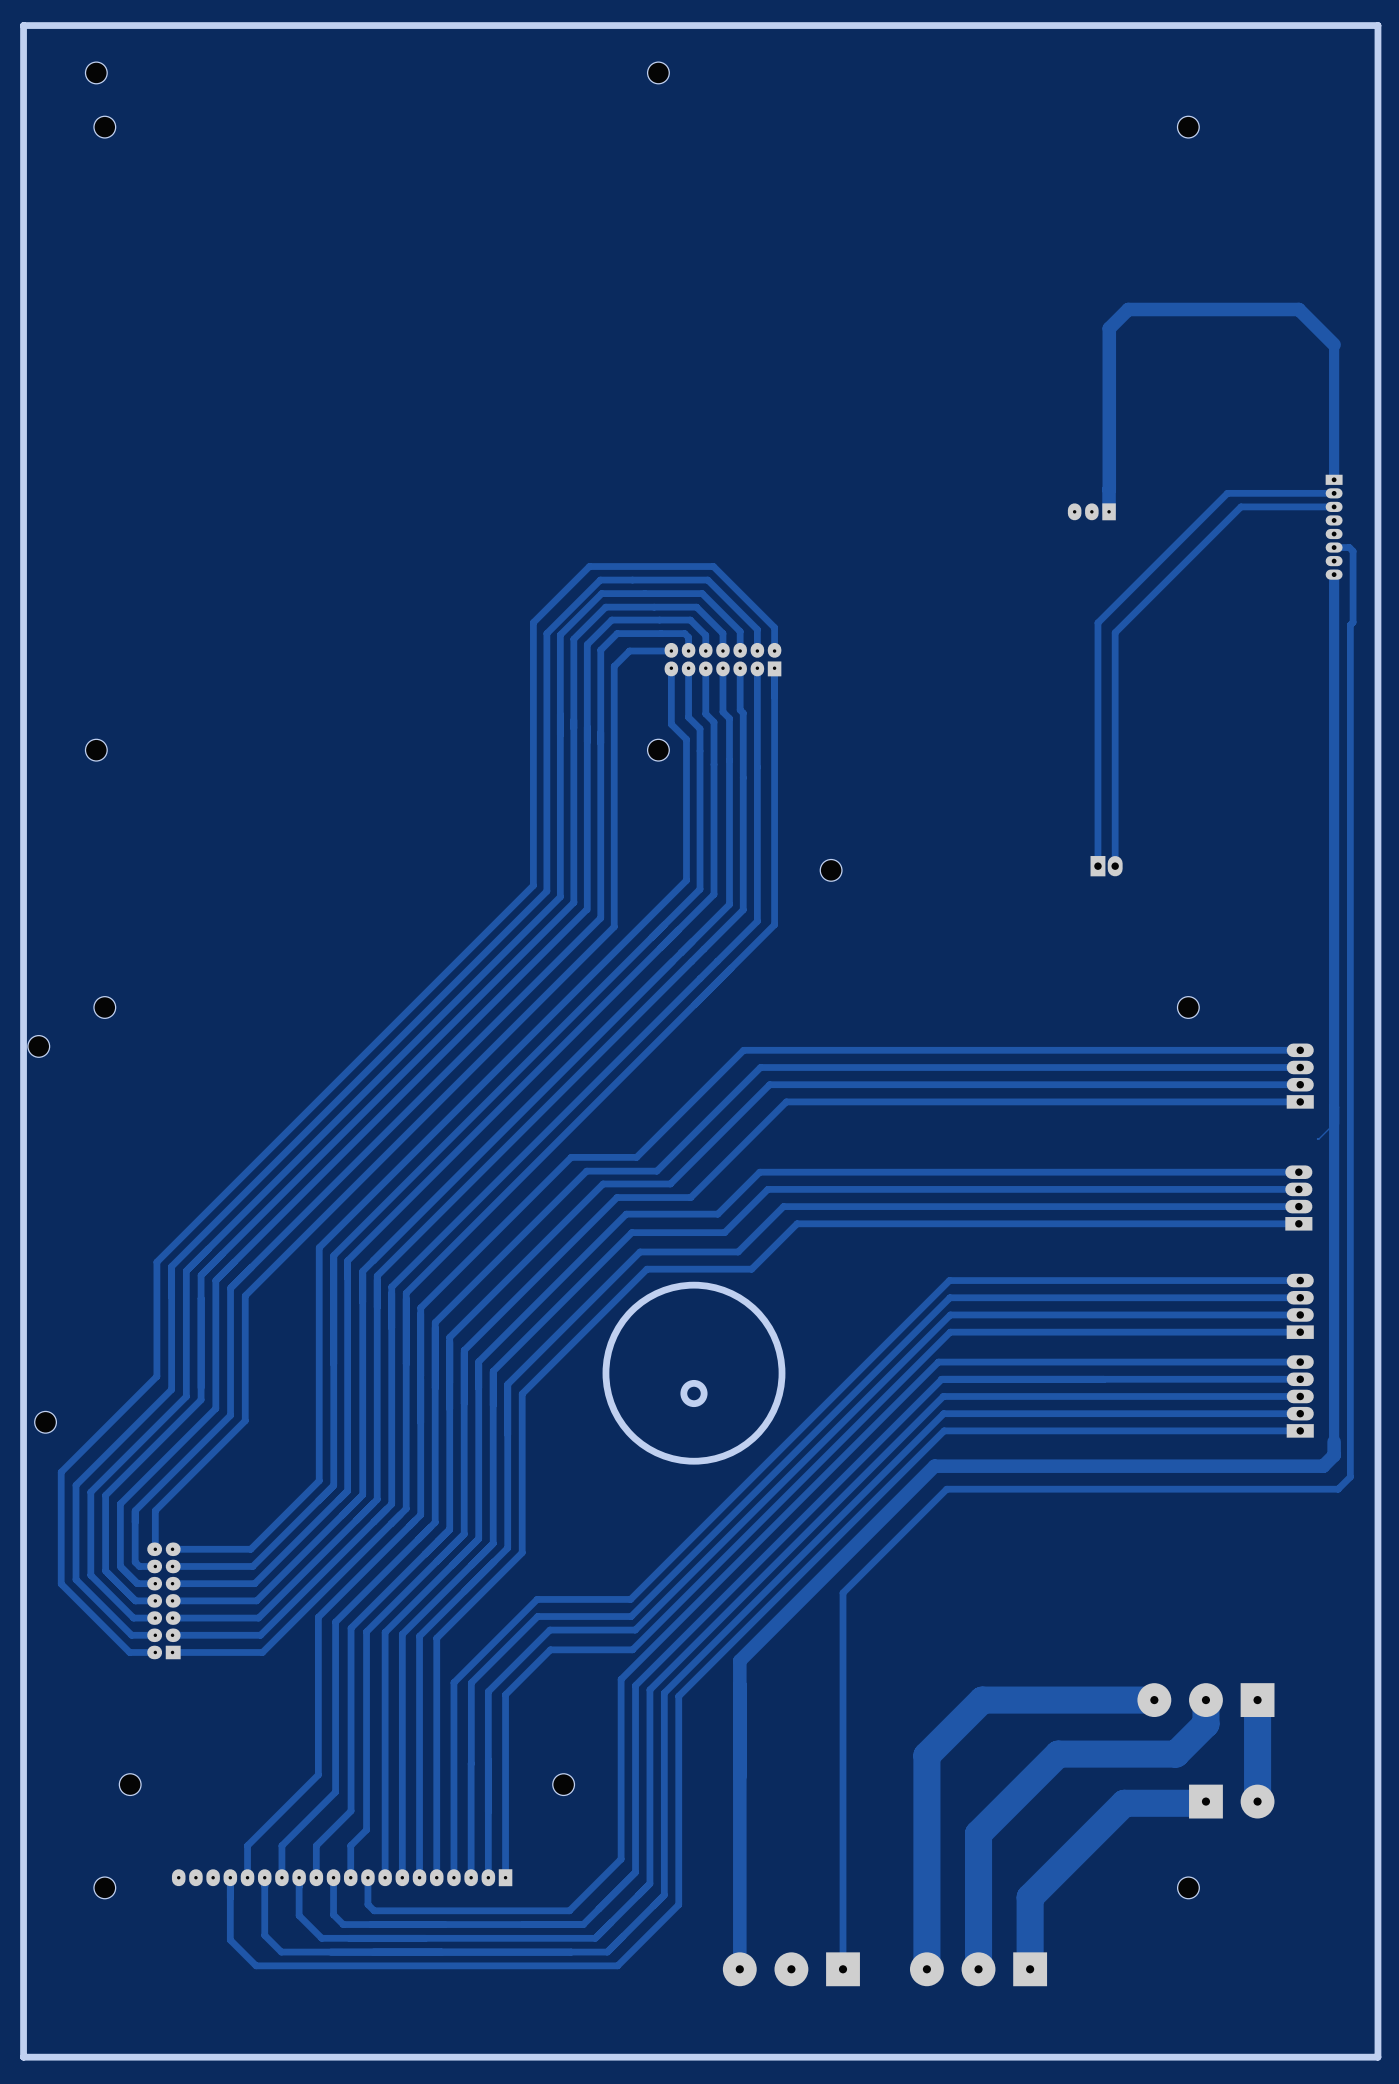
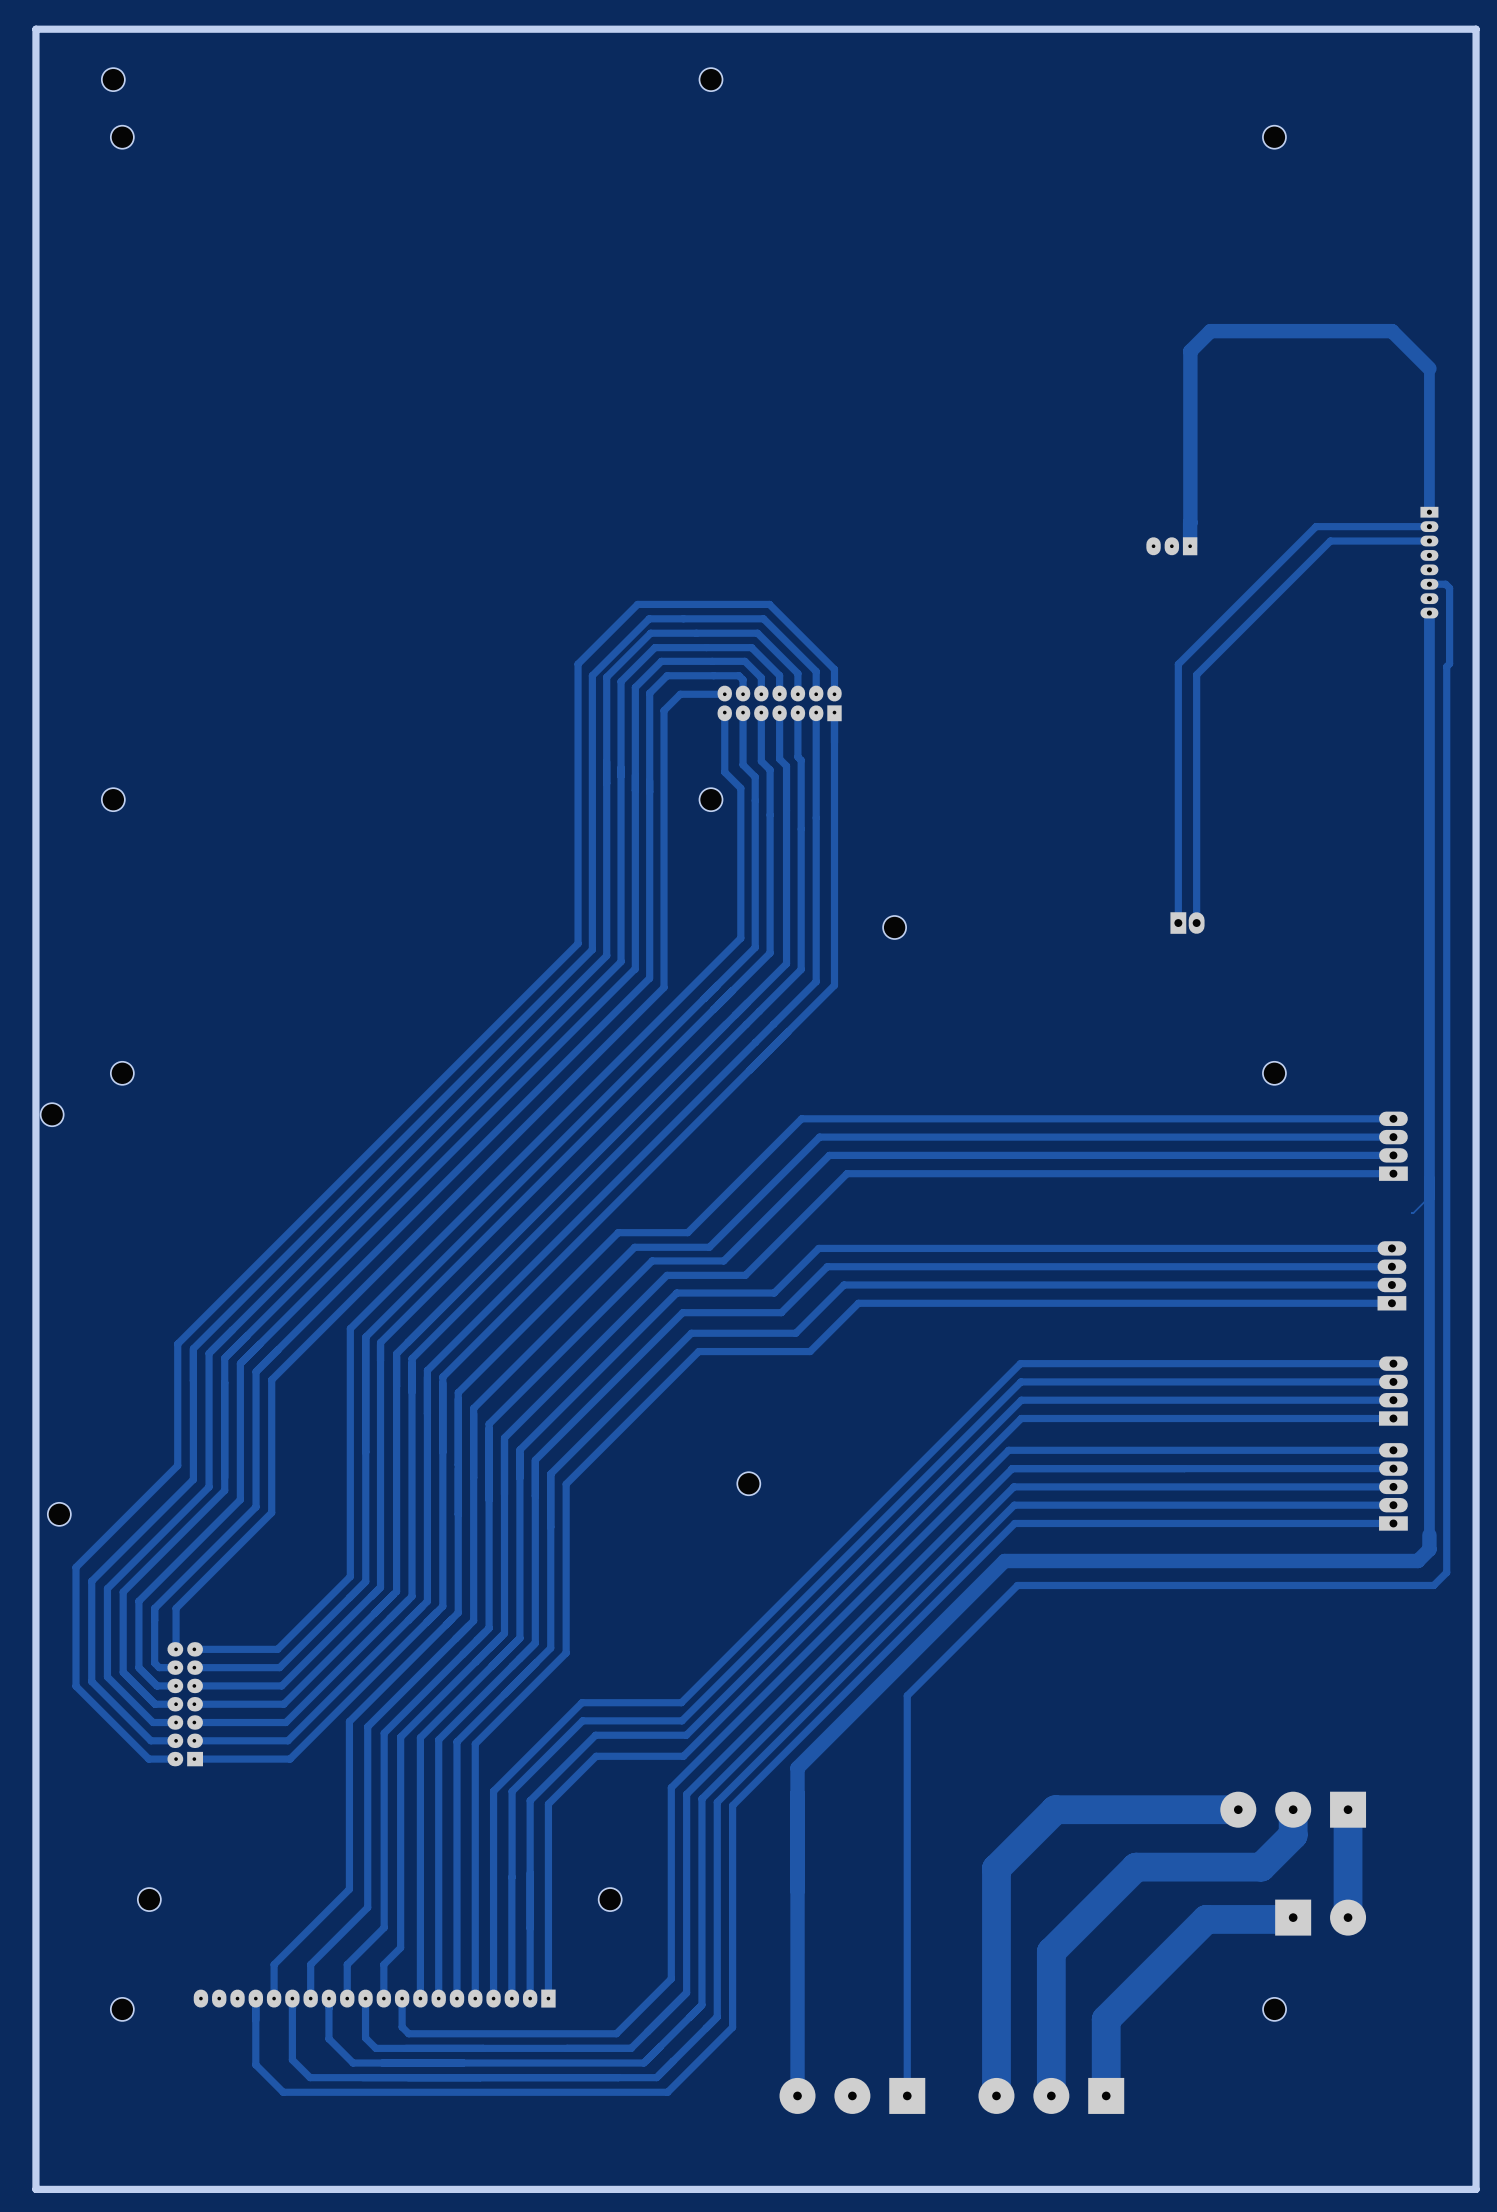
round board edge: [602, 1281, 786, 1465] -> none
round board edge: [680, 1379, 708, 1408] -> none
part: none -> (748, 1483)

